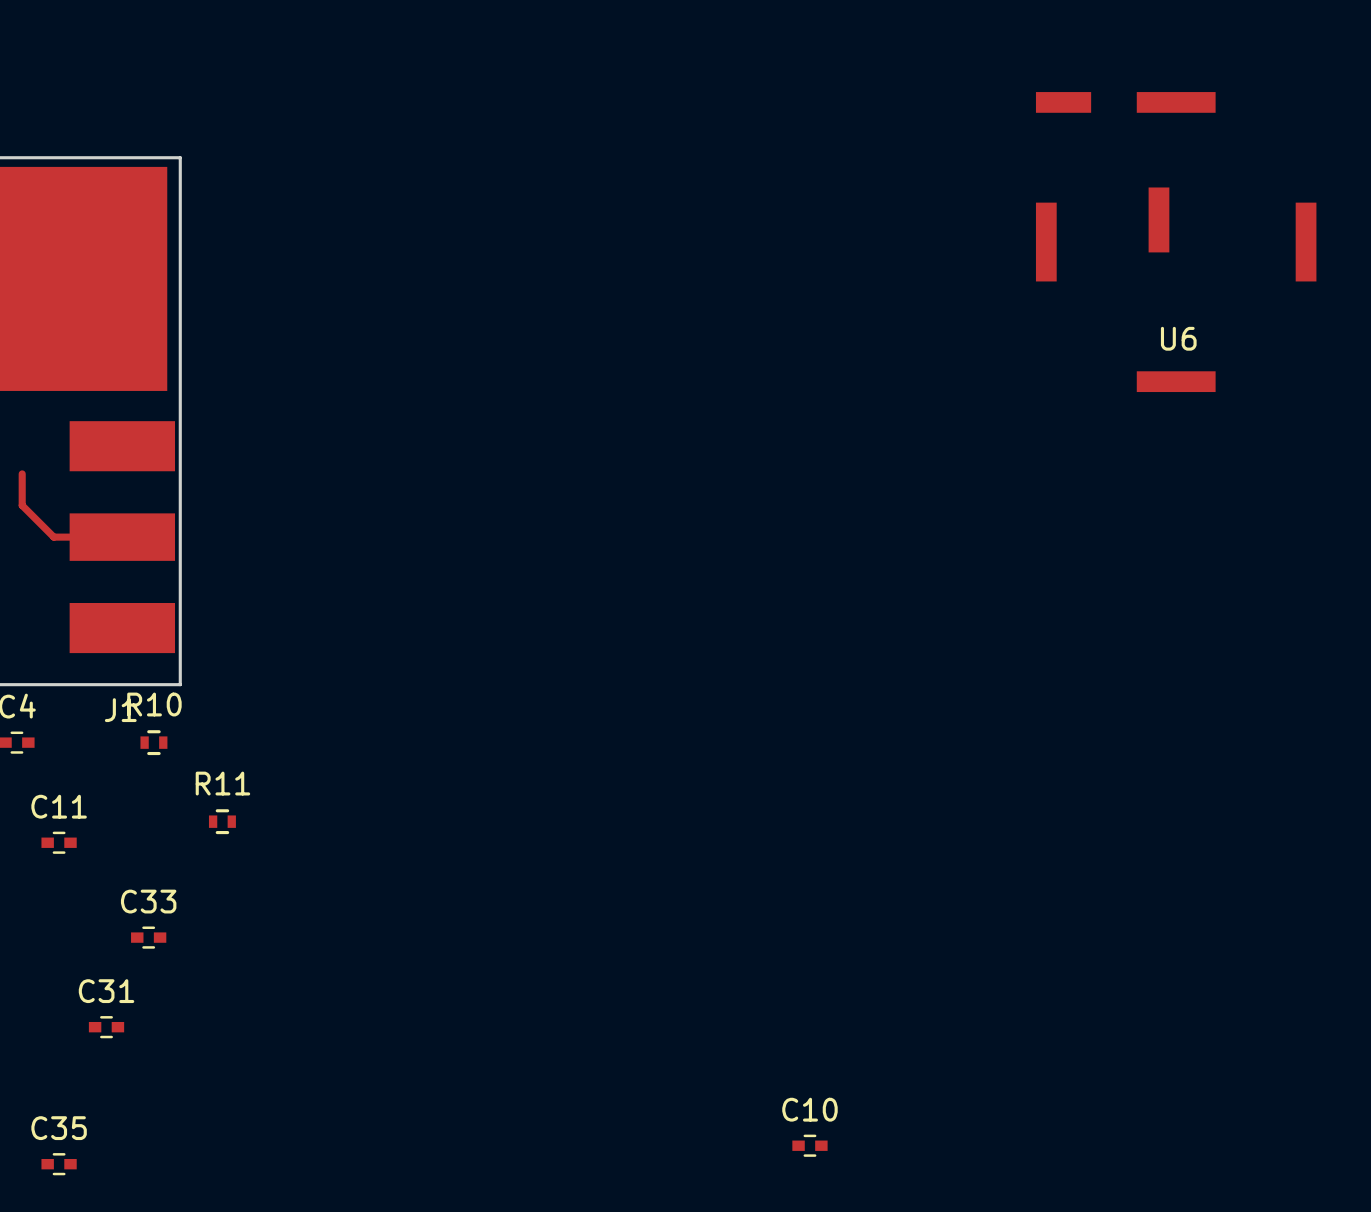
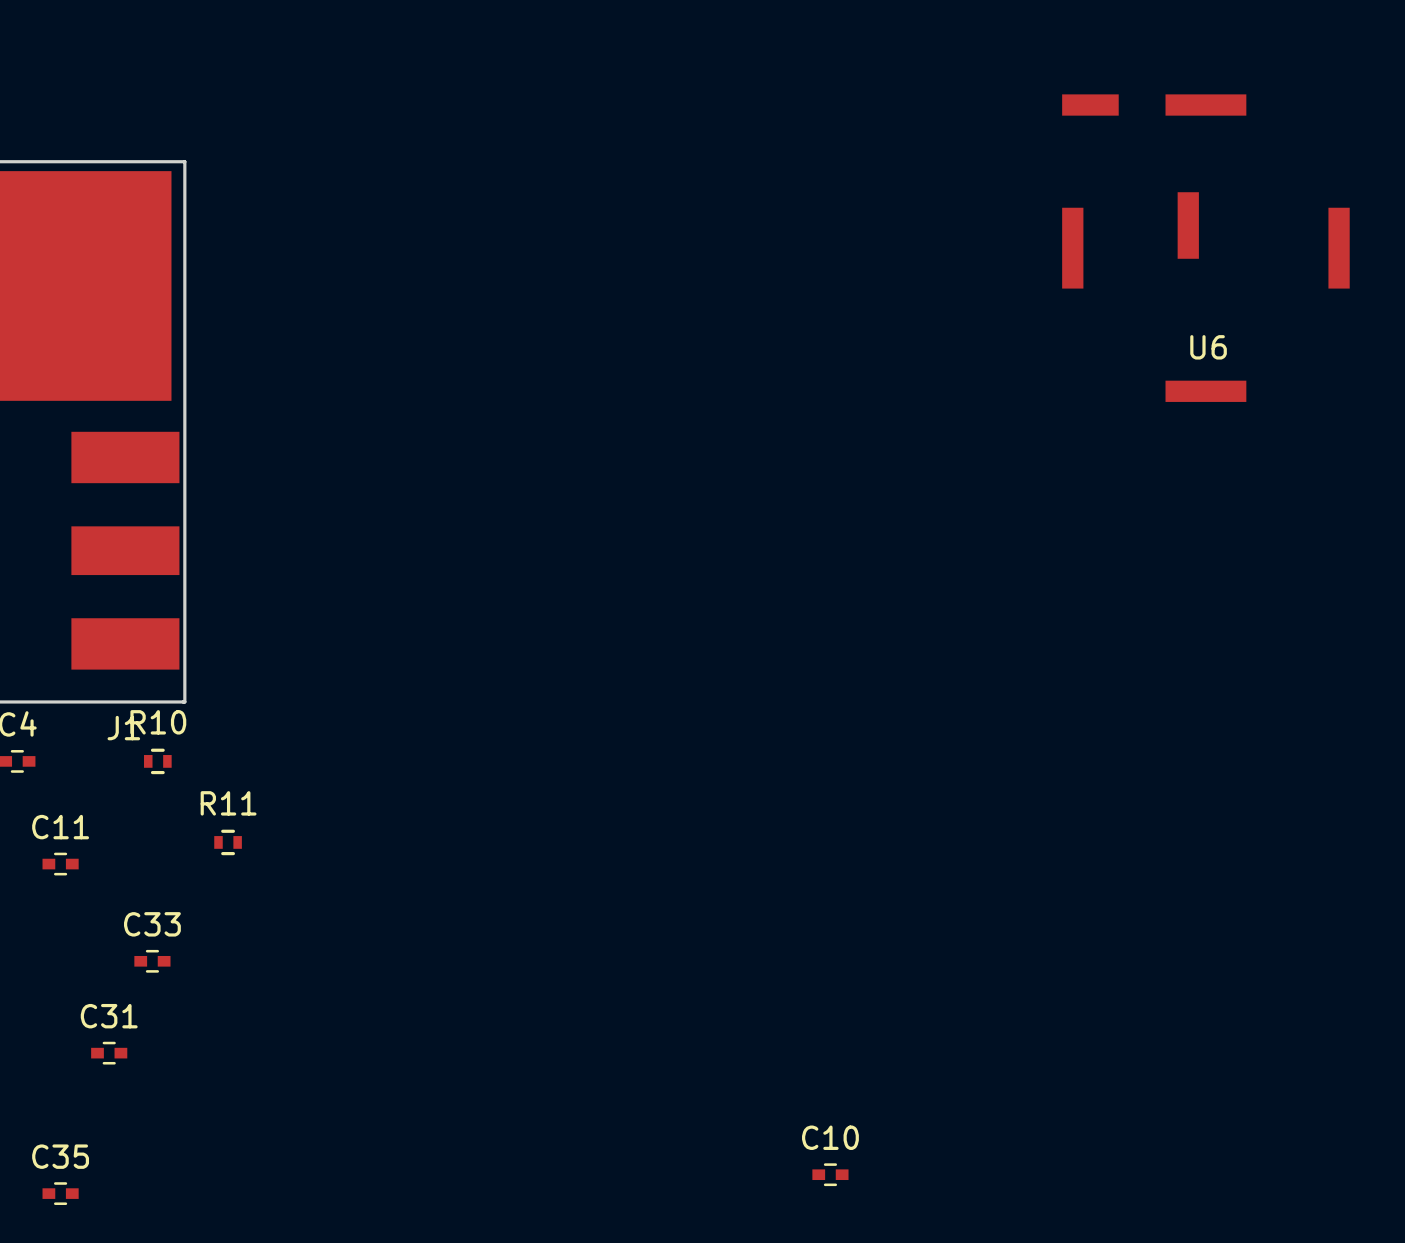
track: (22, 473) (22, 505) (53, 537) (122, 537) -> none

